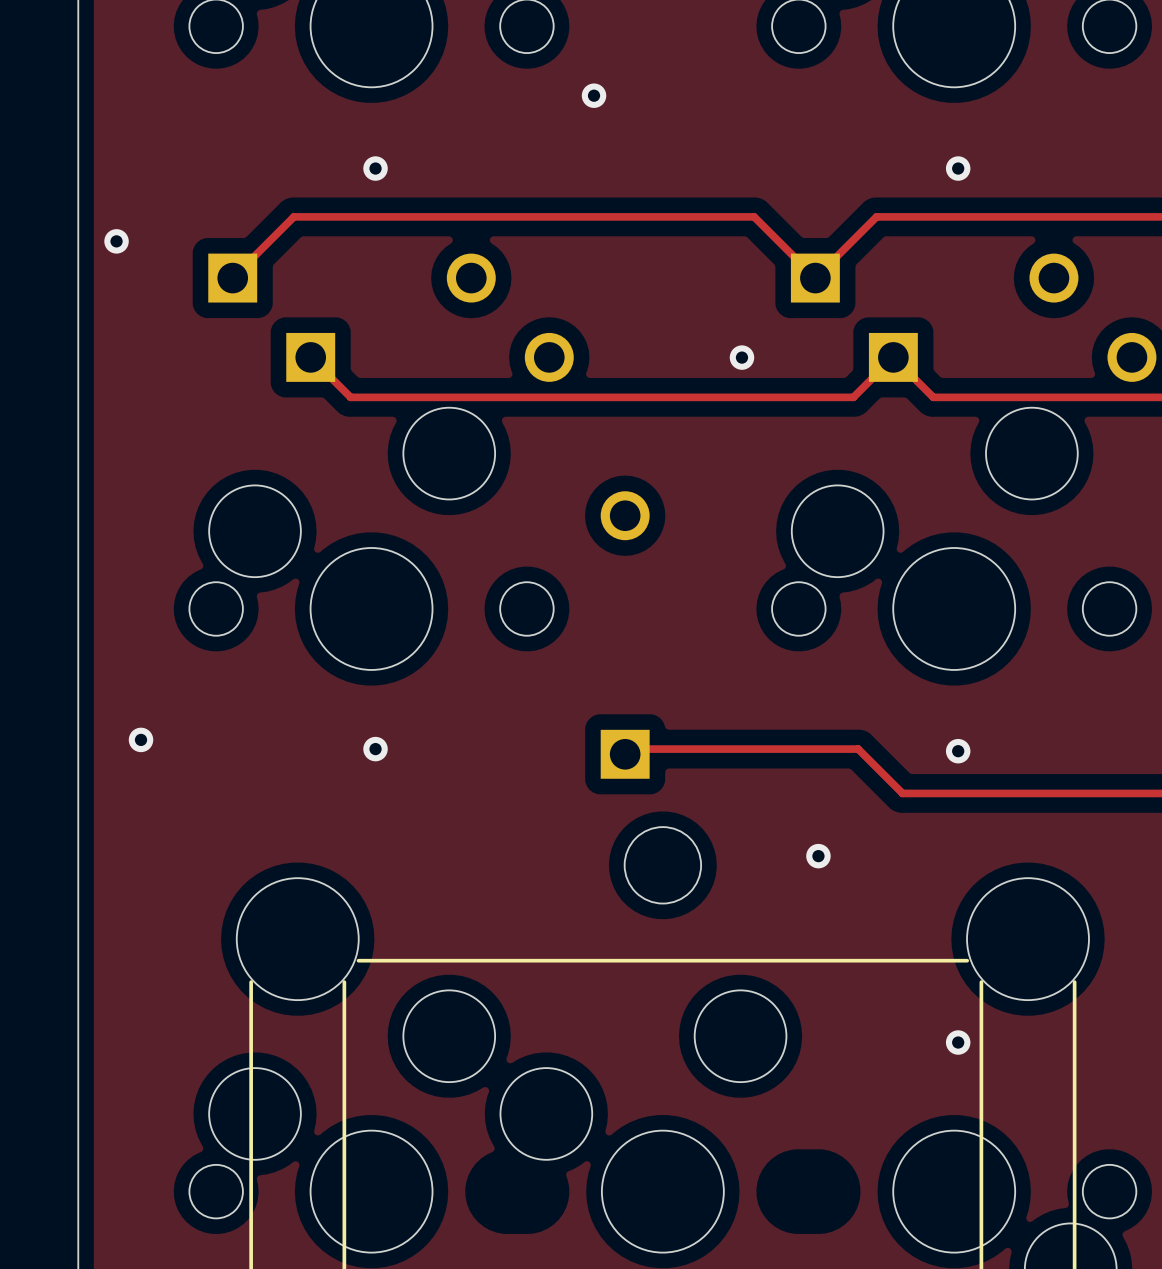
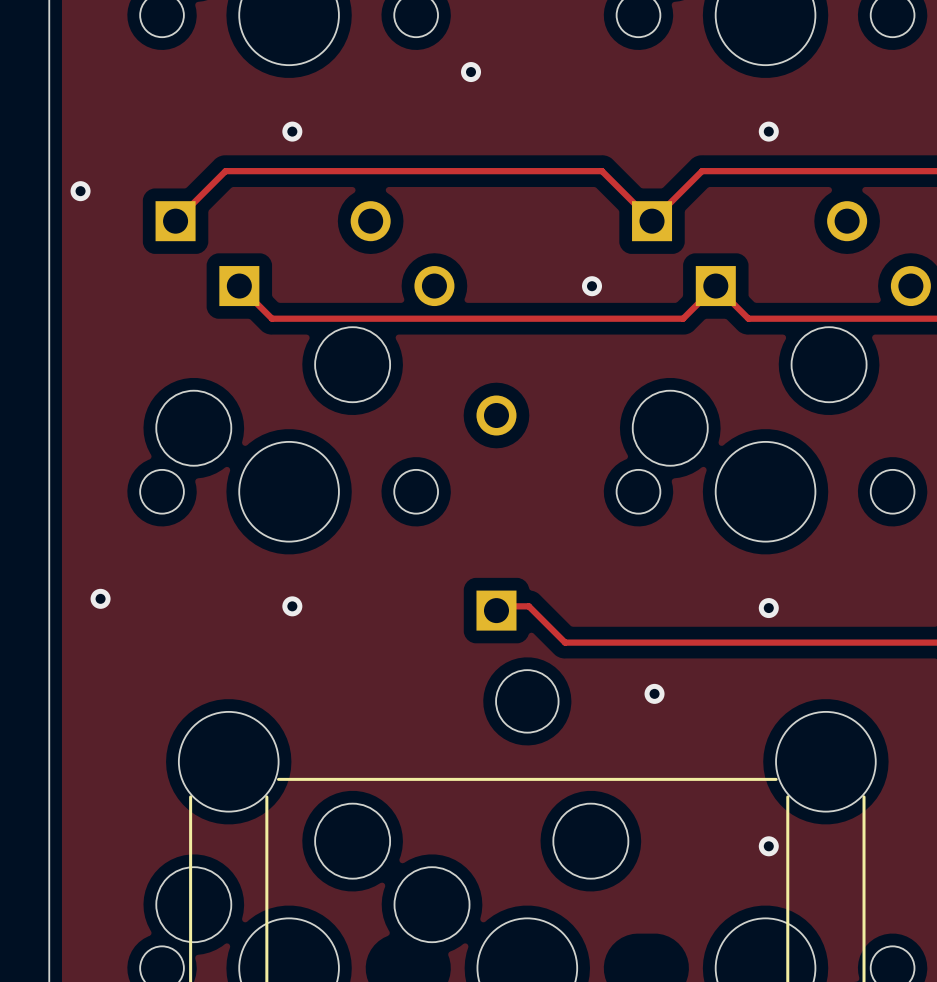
track: (664, 749) (858, 749) (902, 793) -> (528, 606) (565, 642) (723, 642)

